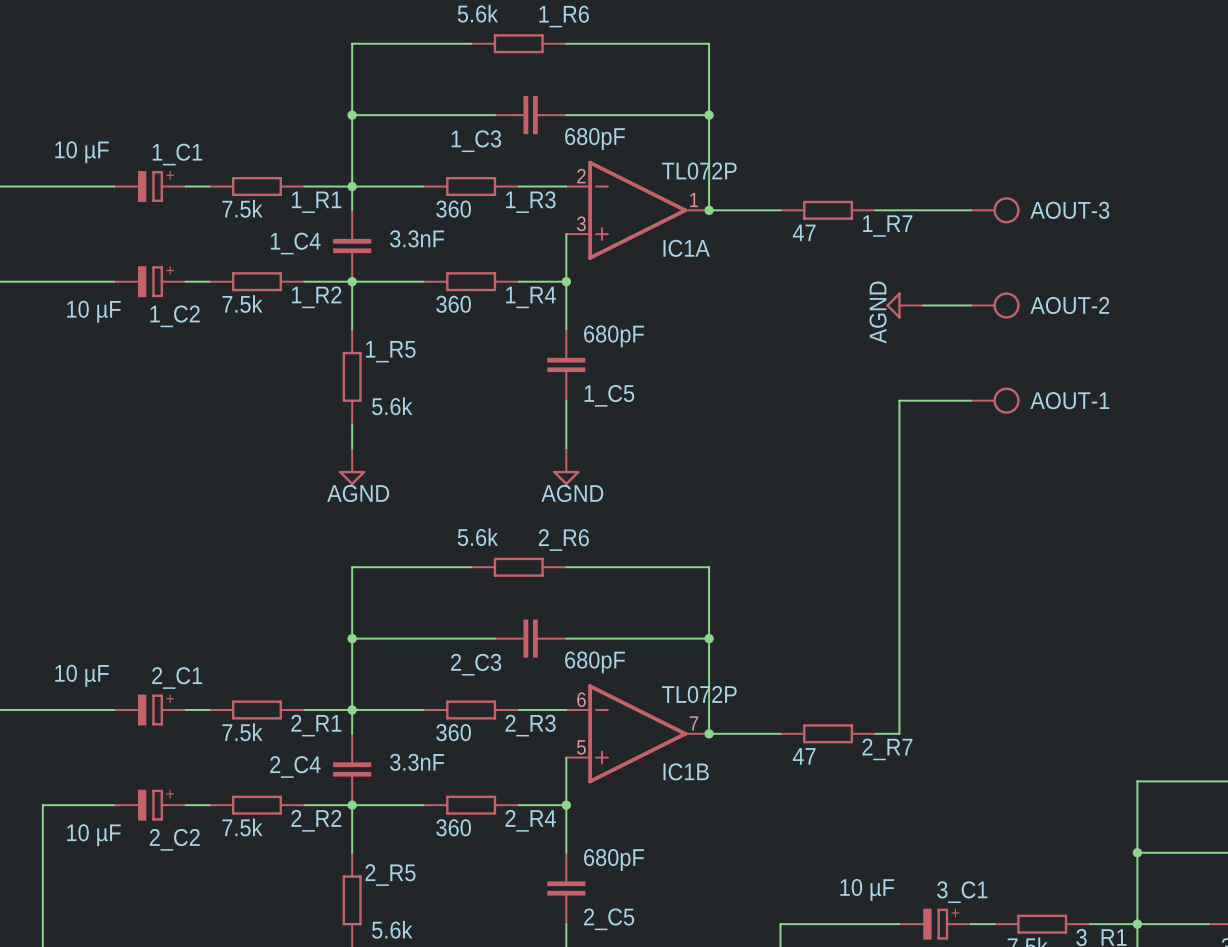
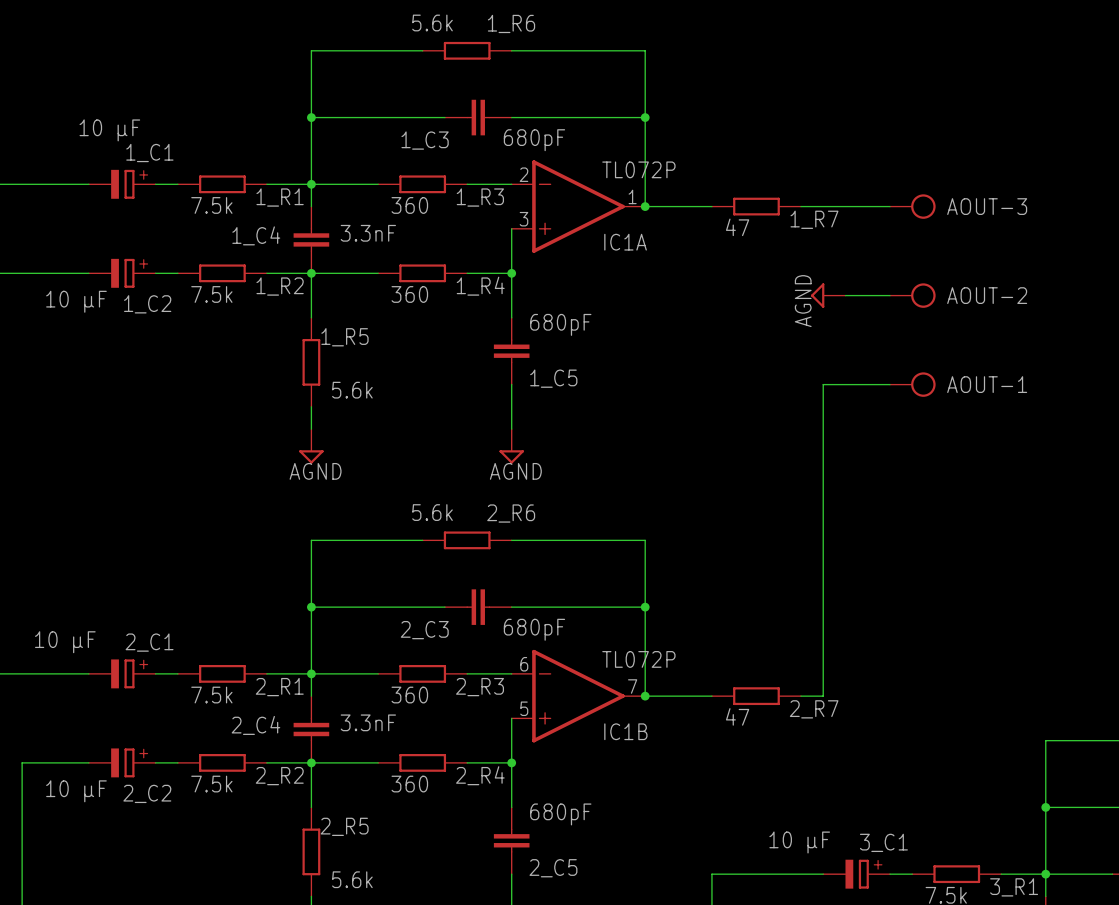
1_C1 value position: 10 µF (82, 152) -> 10 µF (109, 130)

